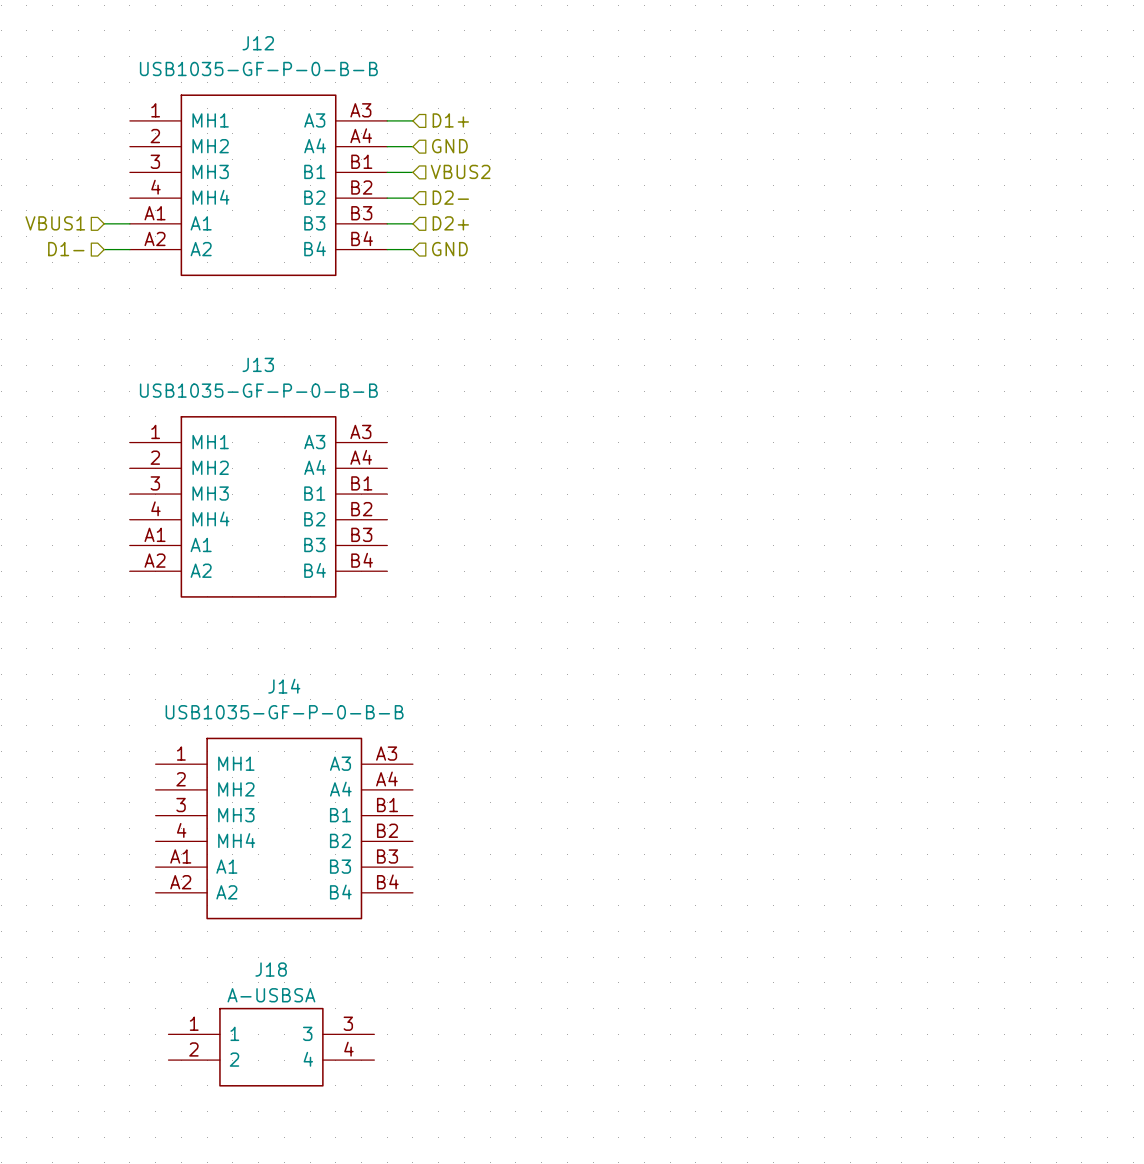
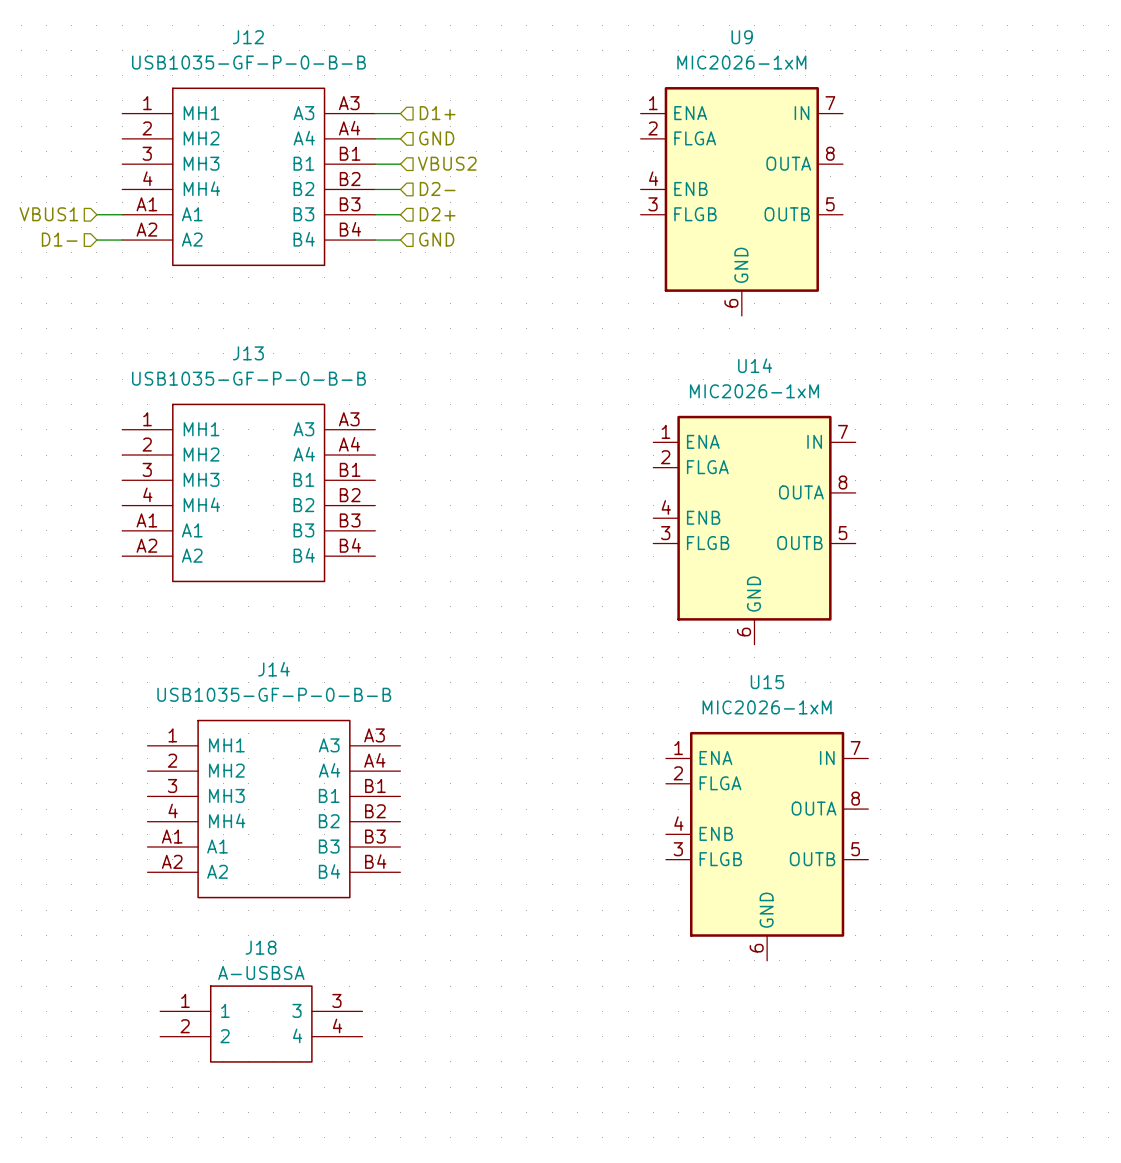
U9: none -> MIC2026-1xM (741, 201)
U14: none -> MIC2026-1xM (754, 530)
U15: none -> MIC2026-1xM (767, 846)

